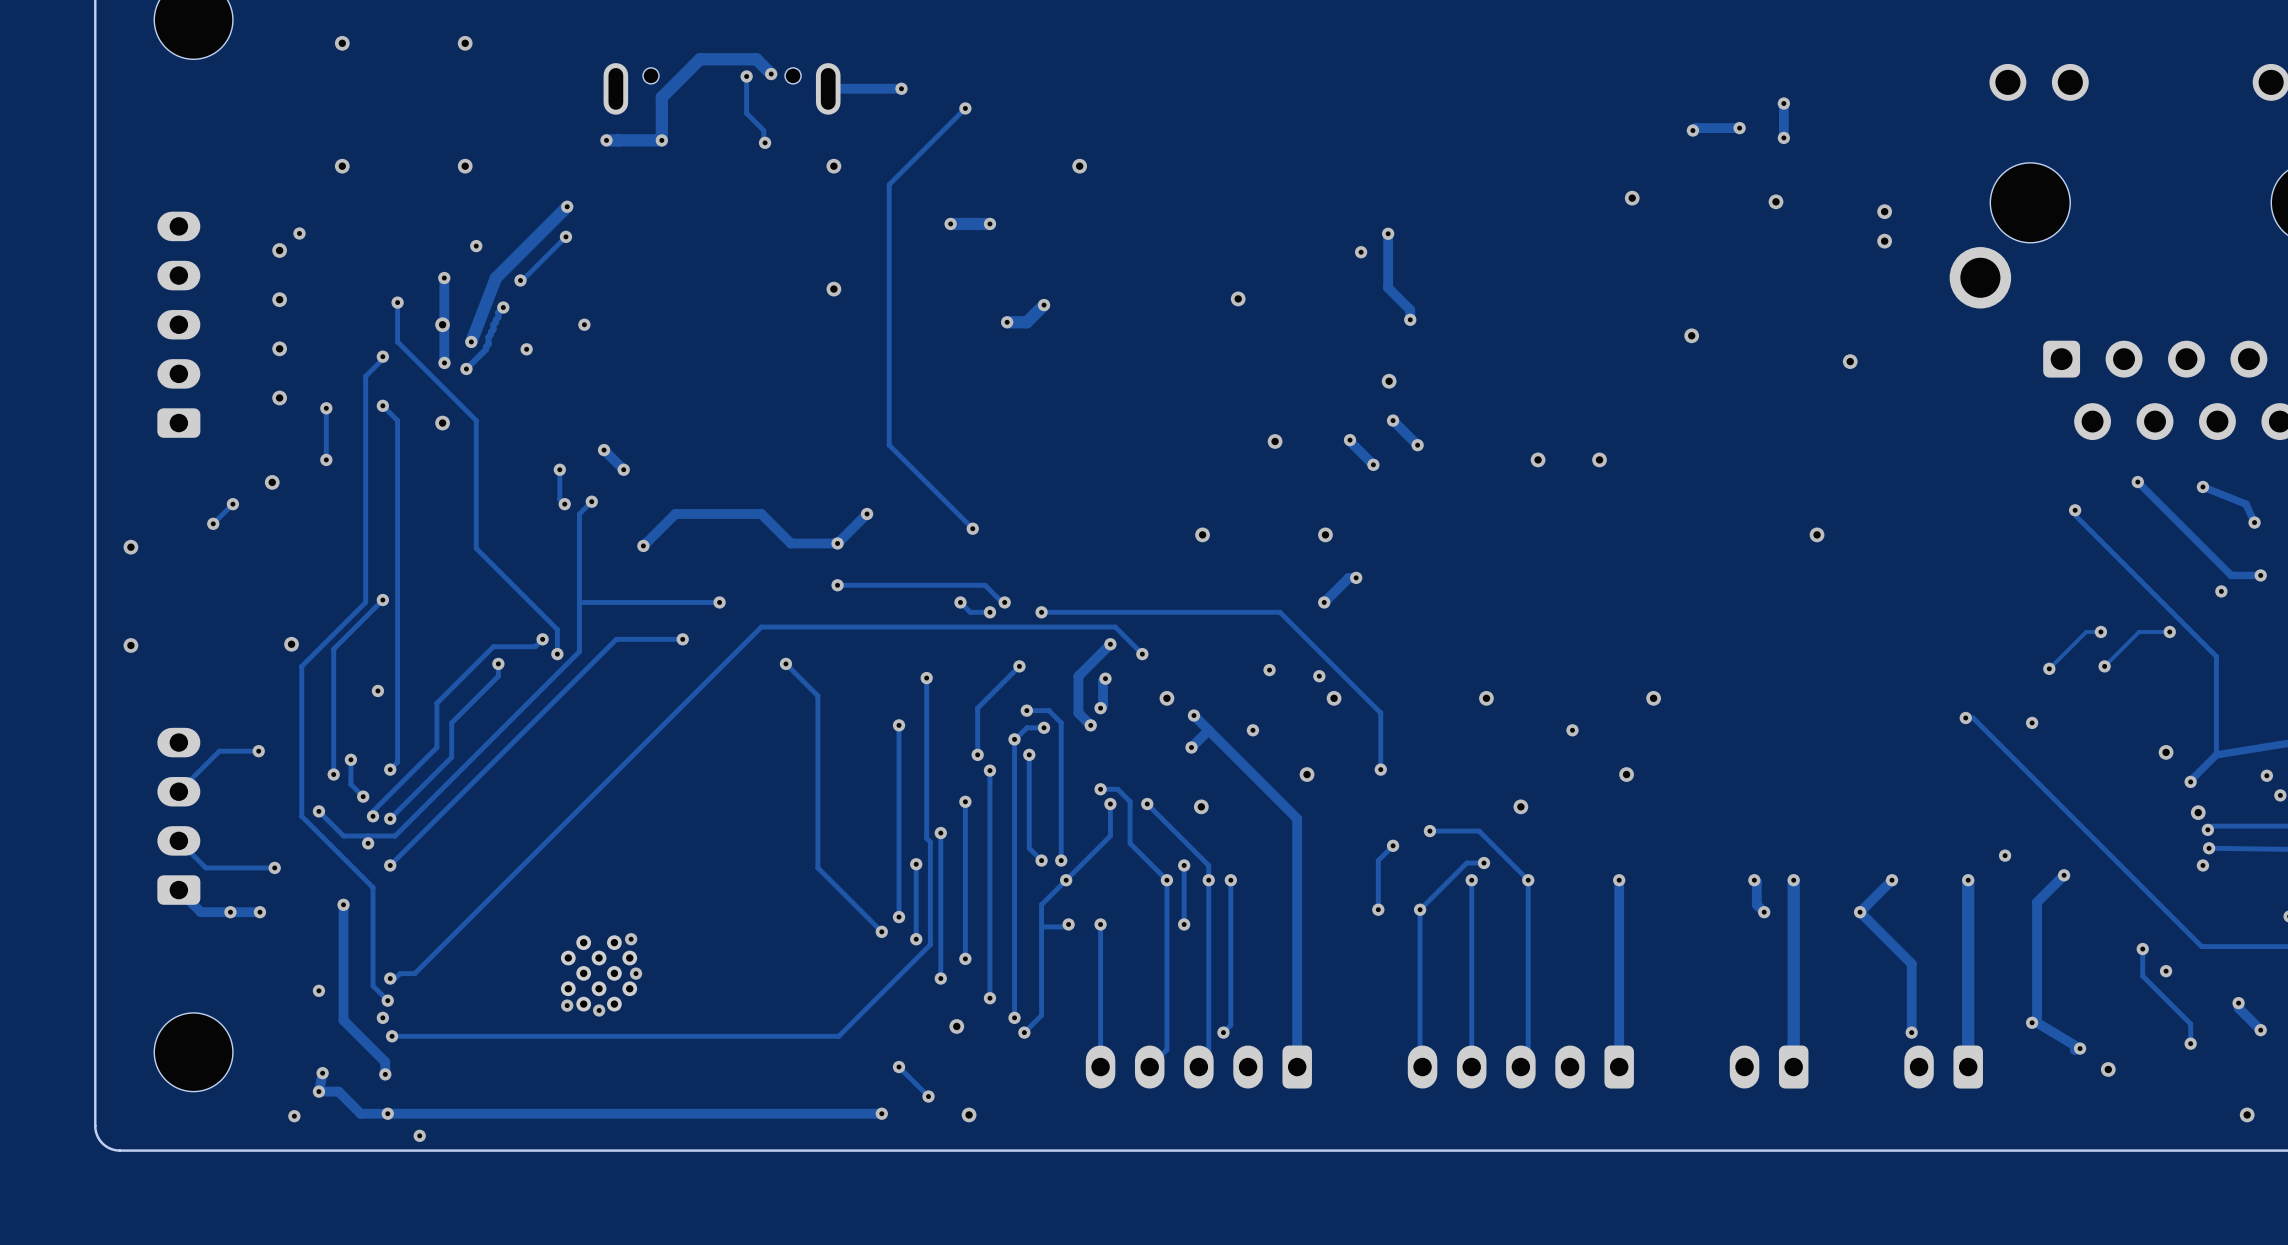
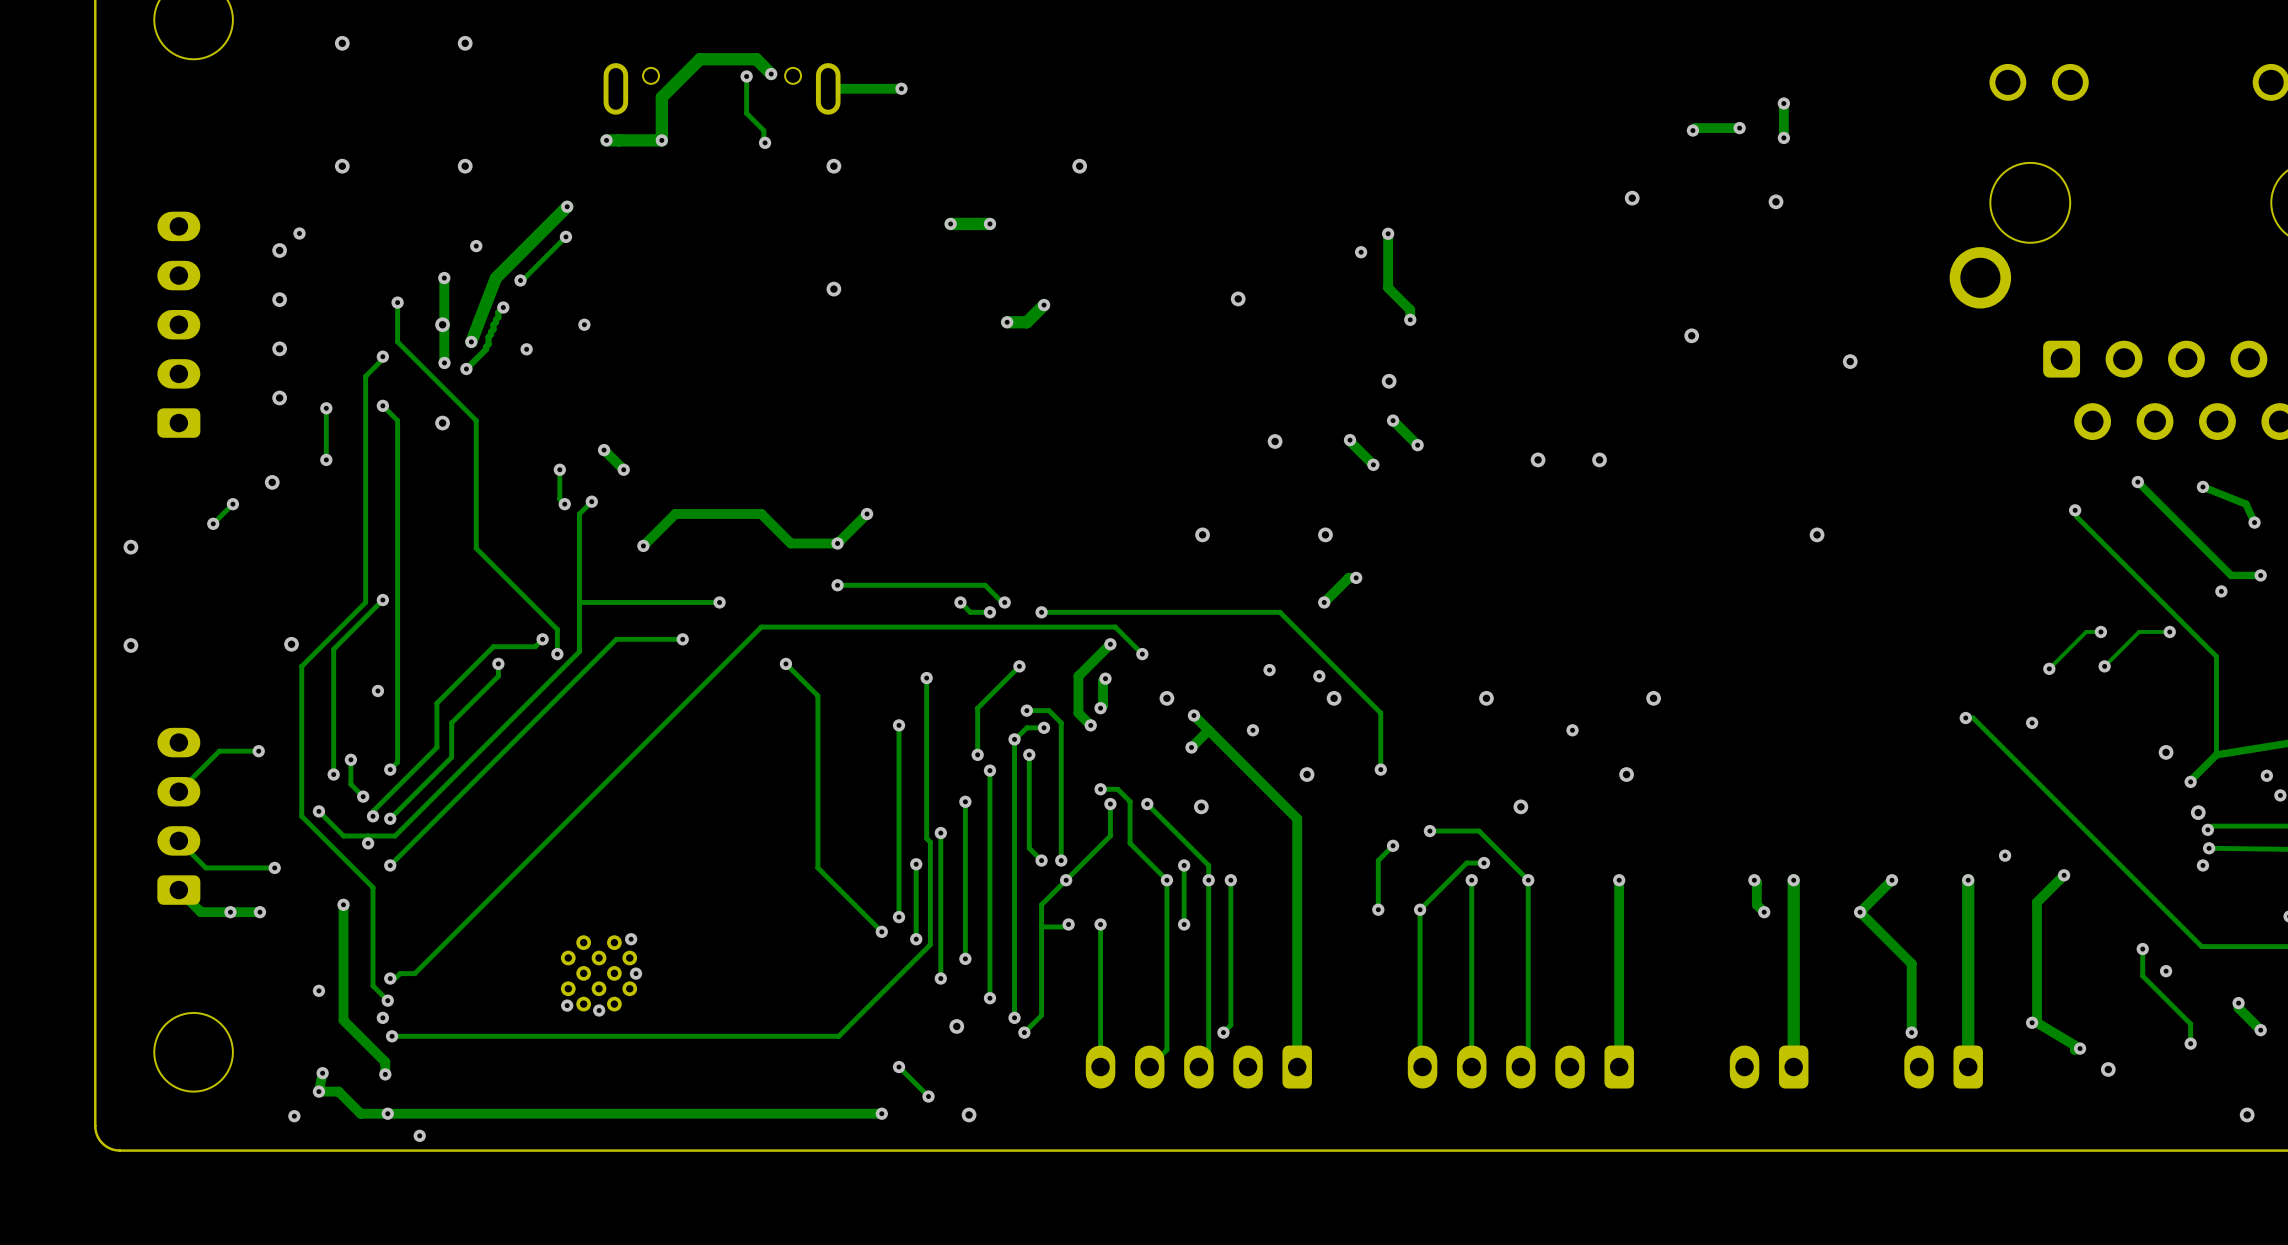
track: (965, 108) (889, 184) (889, 445) (972, 528) -> none
via: (965, 108) -> none
via: (1884, 211) -> none
via: (1884, 241) -> none
via: (972, 528) -> none

